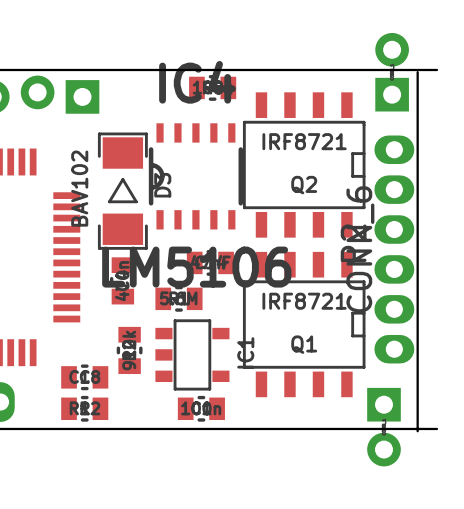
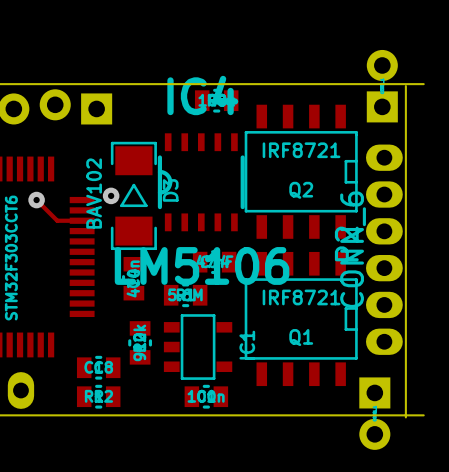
via: none -> (111, 195)
track: none -> (36, 200) (57, 220) (82, 220)
via: none -> (36, 200)

